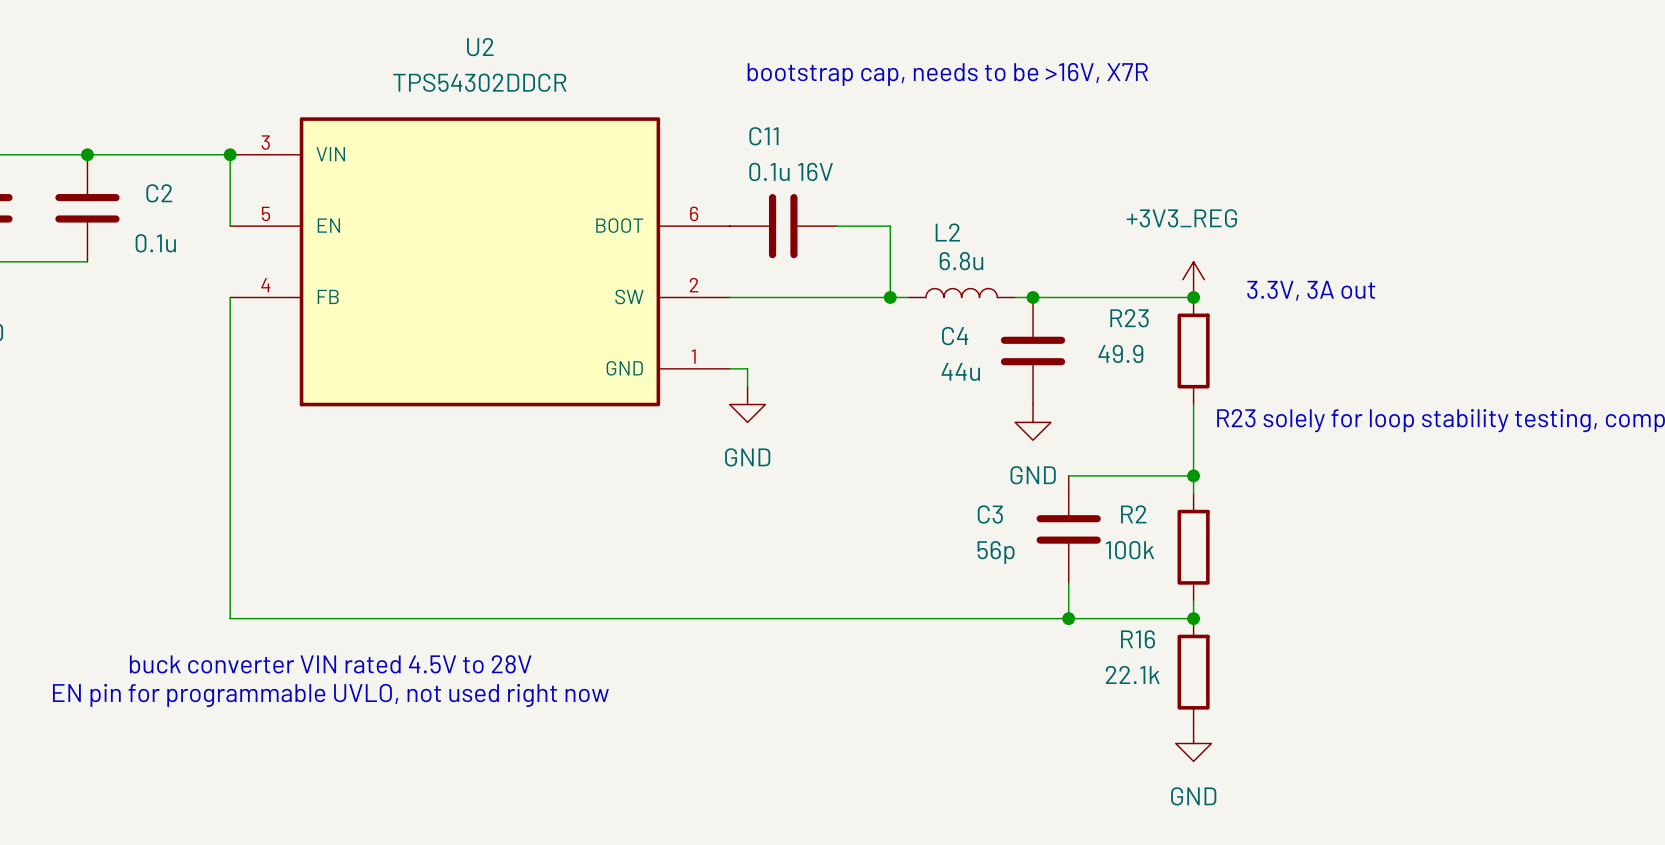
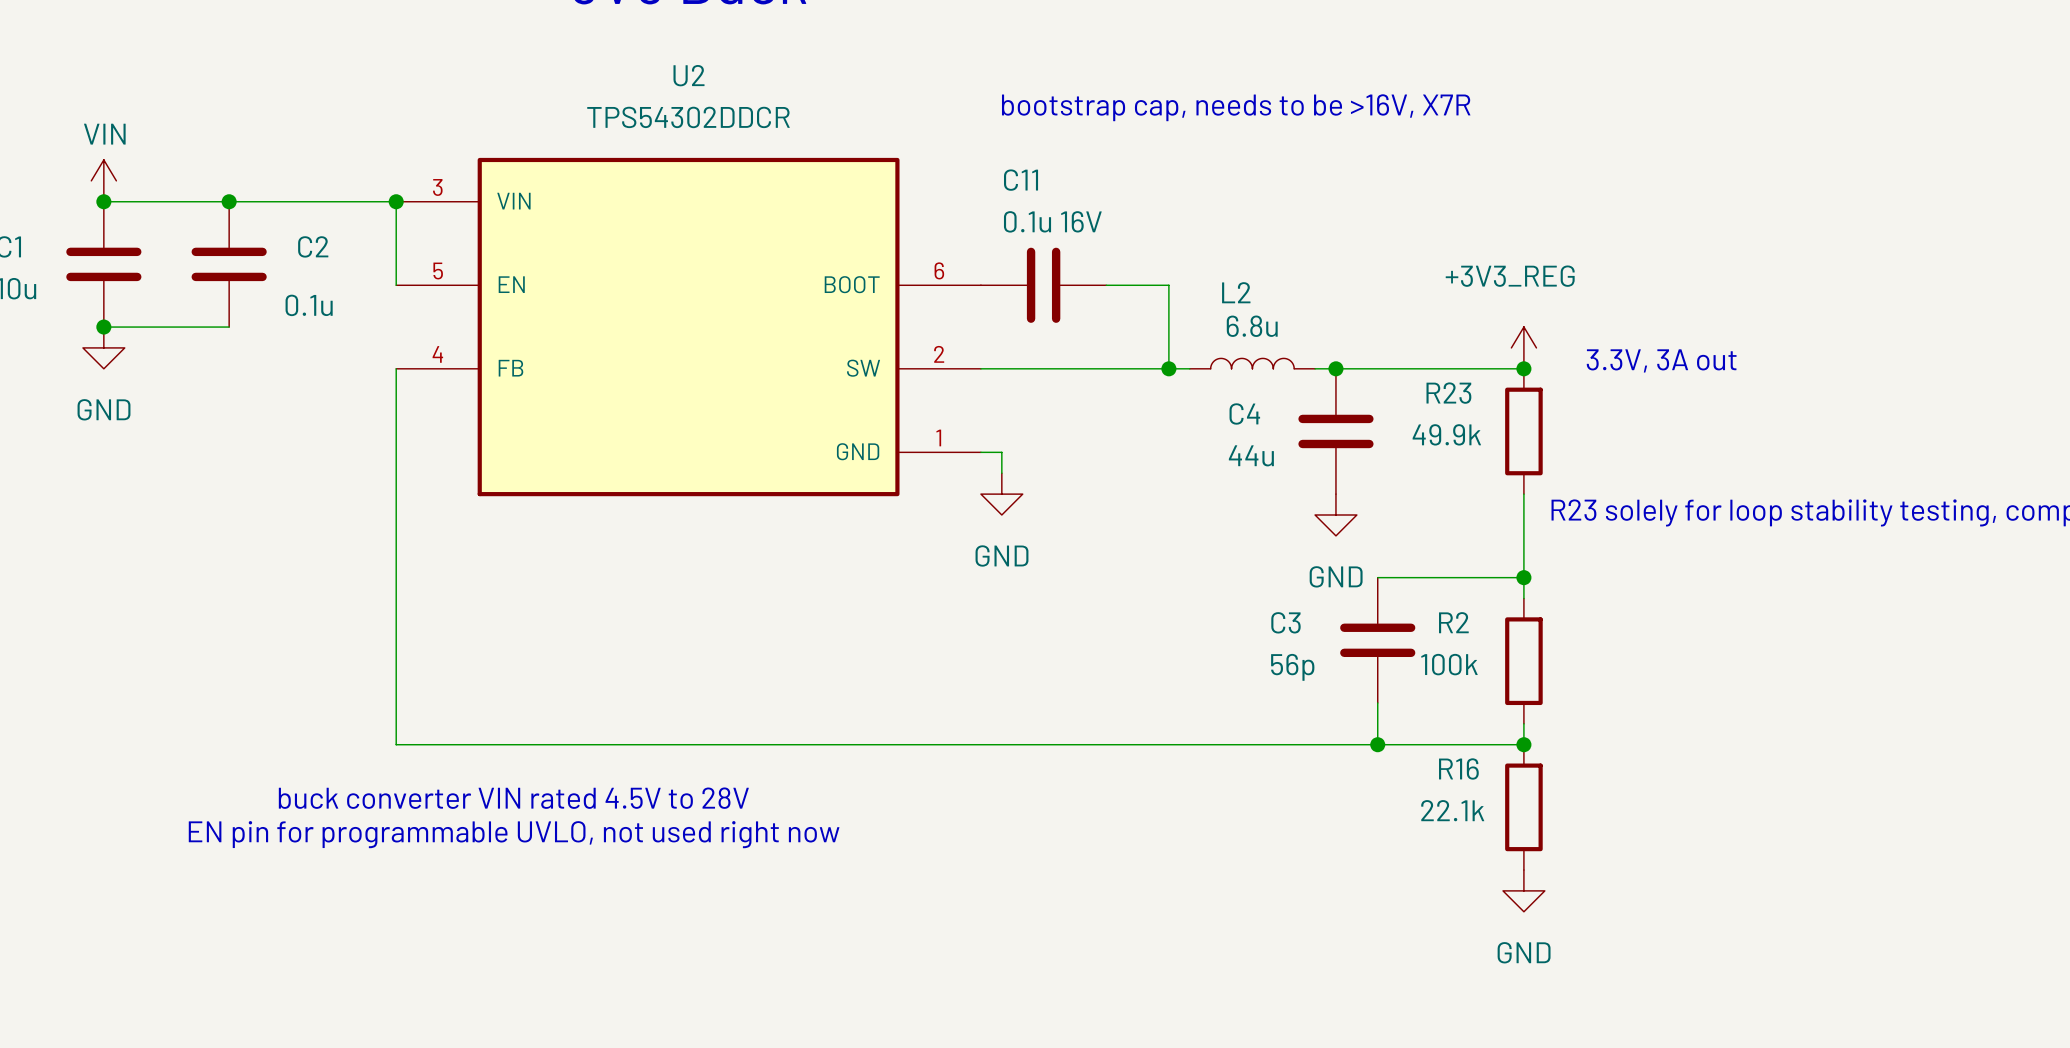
R23 value: 49.9 (1120, 353) -> 49.9k (1446, 434)

